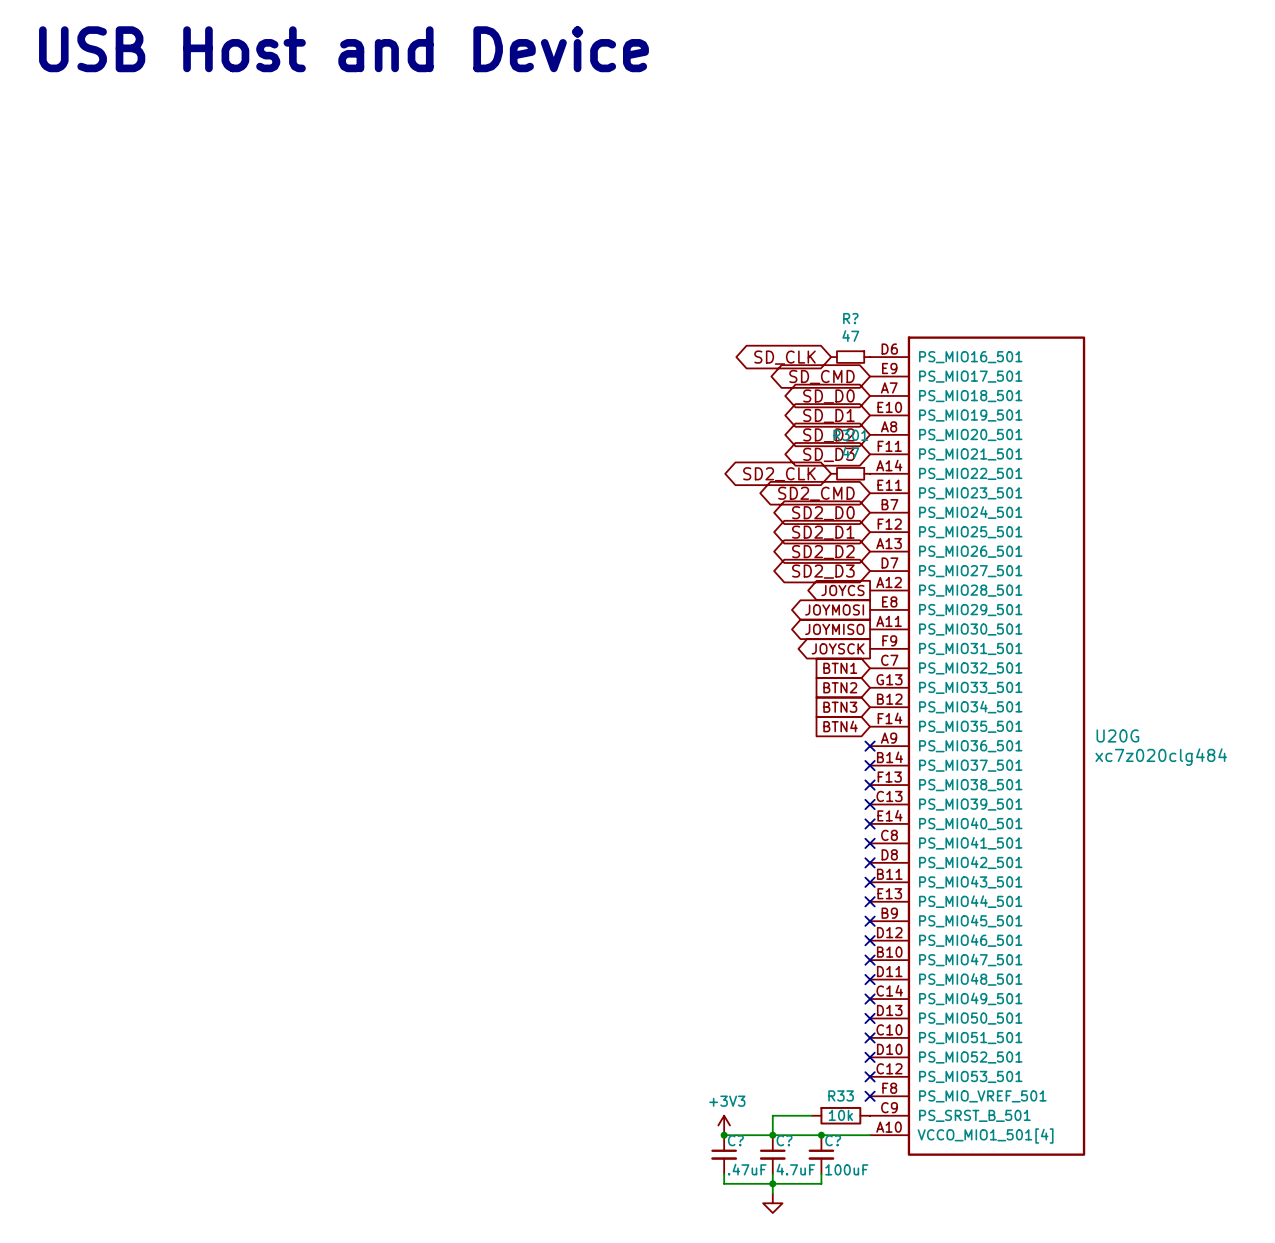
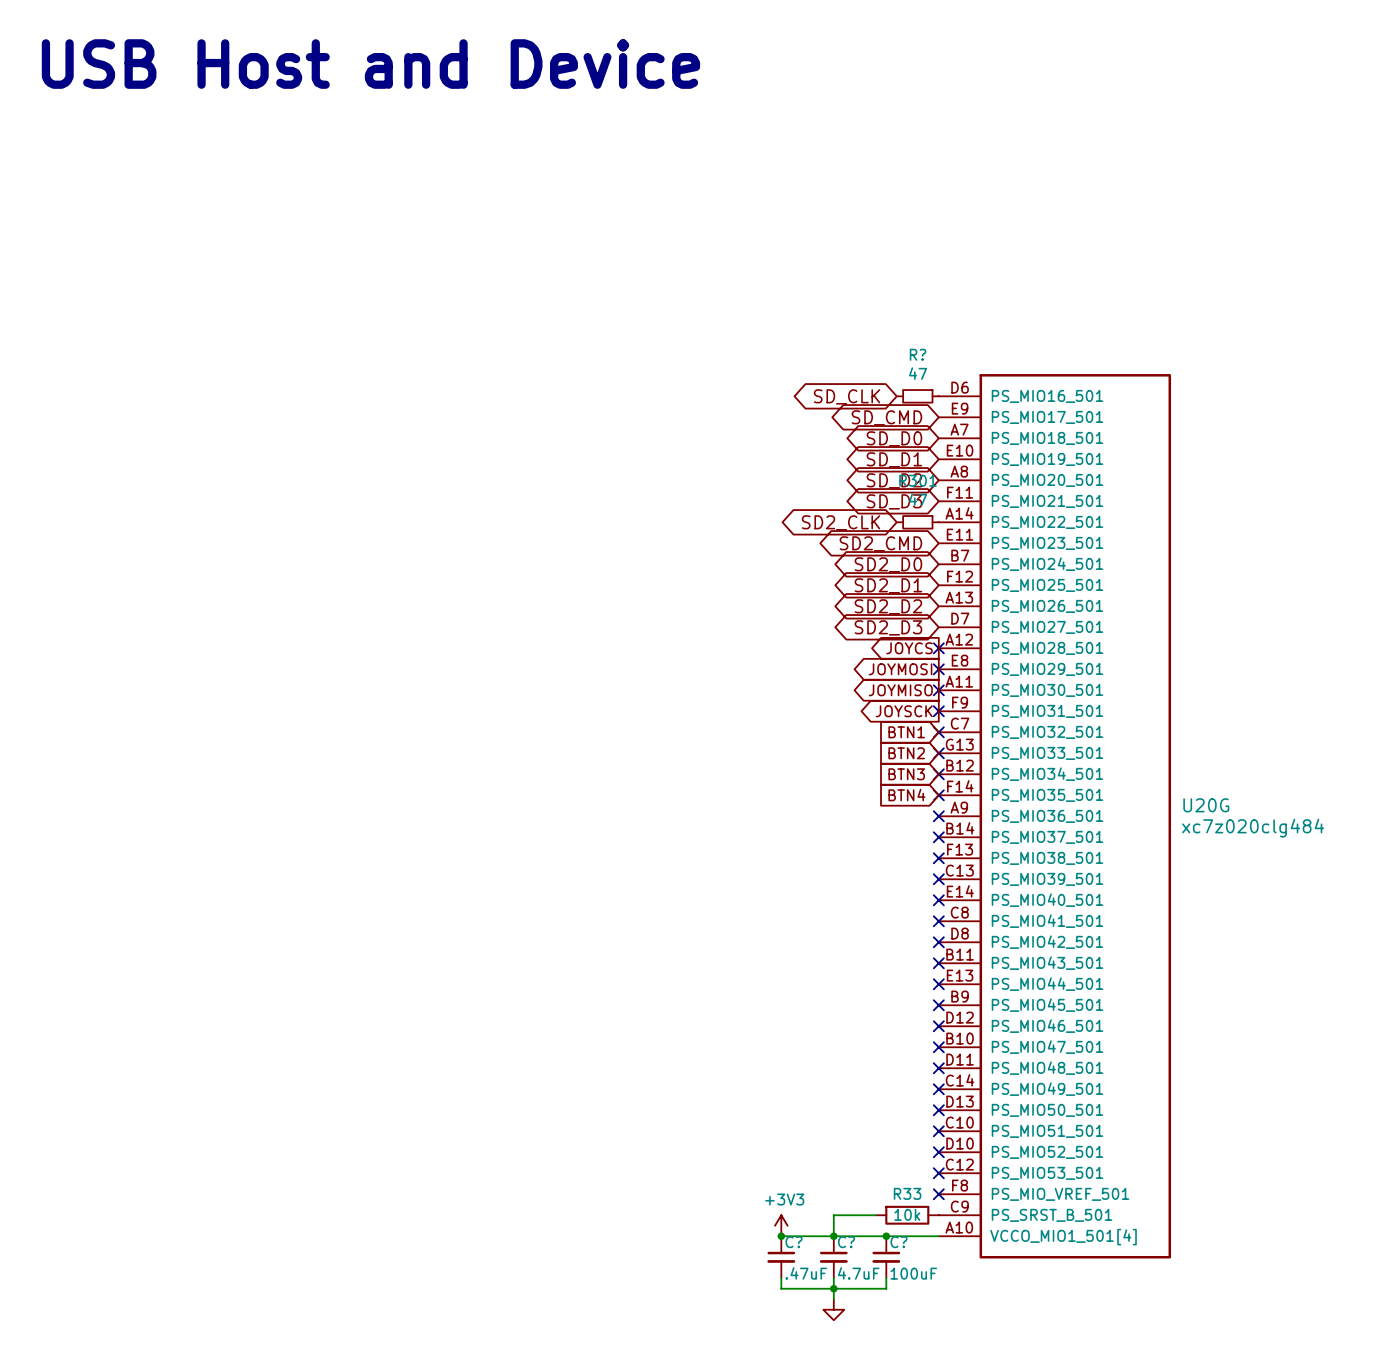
no-connect mark: none -> (938, 648)
no-connect mark: none -> (938, 669)
no-connect mark: none -> (938, 690)
no-connect mark: none -> (938, 711)
no-connect mark: none -> (938, 732)
no-connect mark: none -> (938, 753)
no-connect mark: none -> (938, 774)
no-connect mark: none -> (938, 795)

